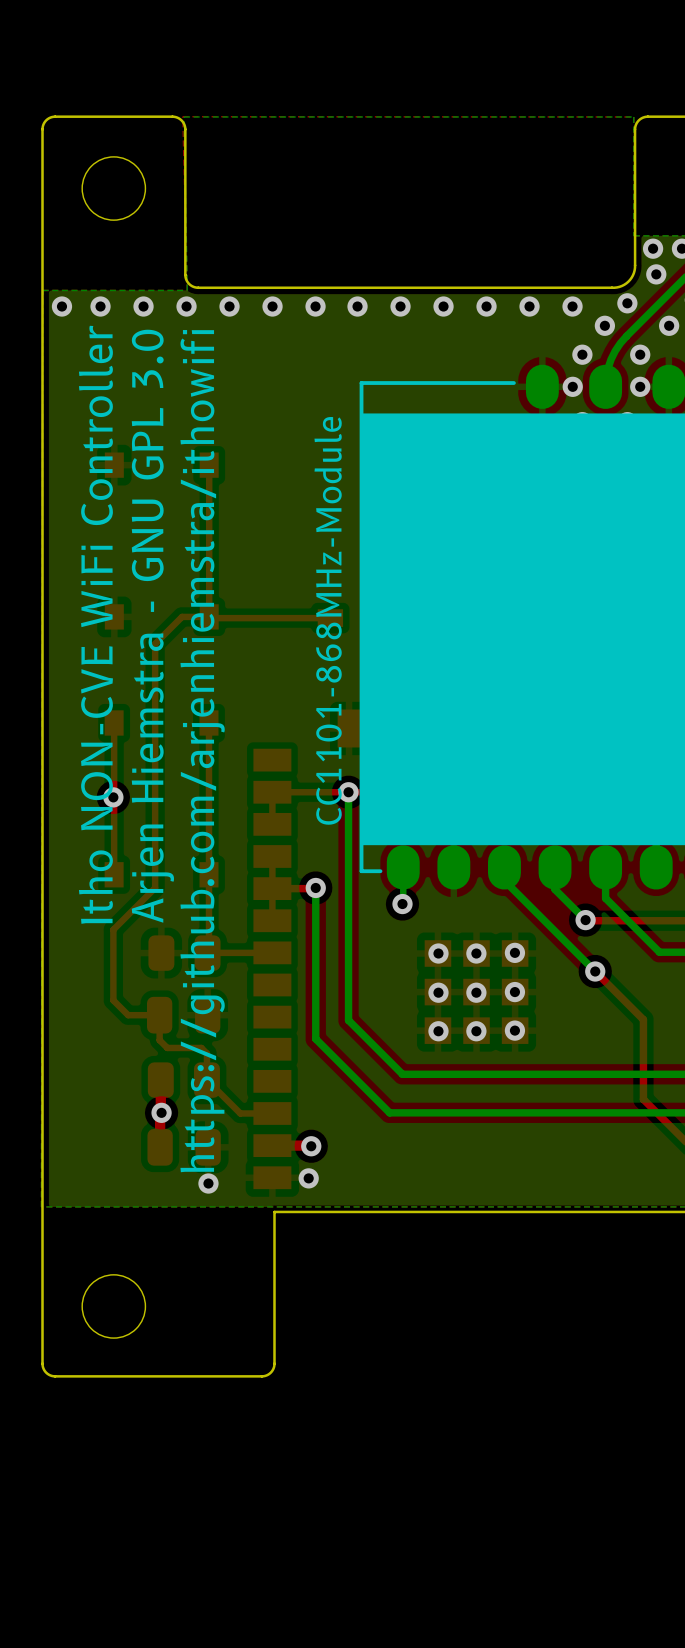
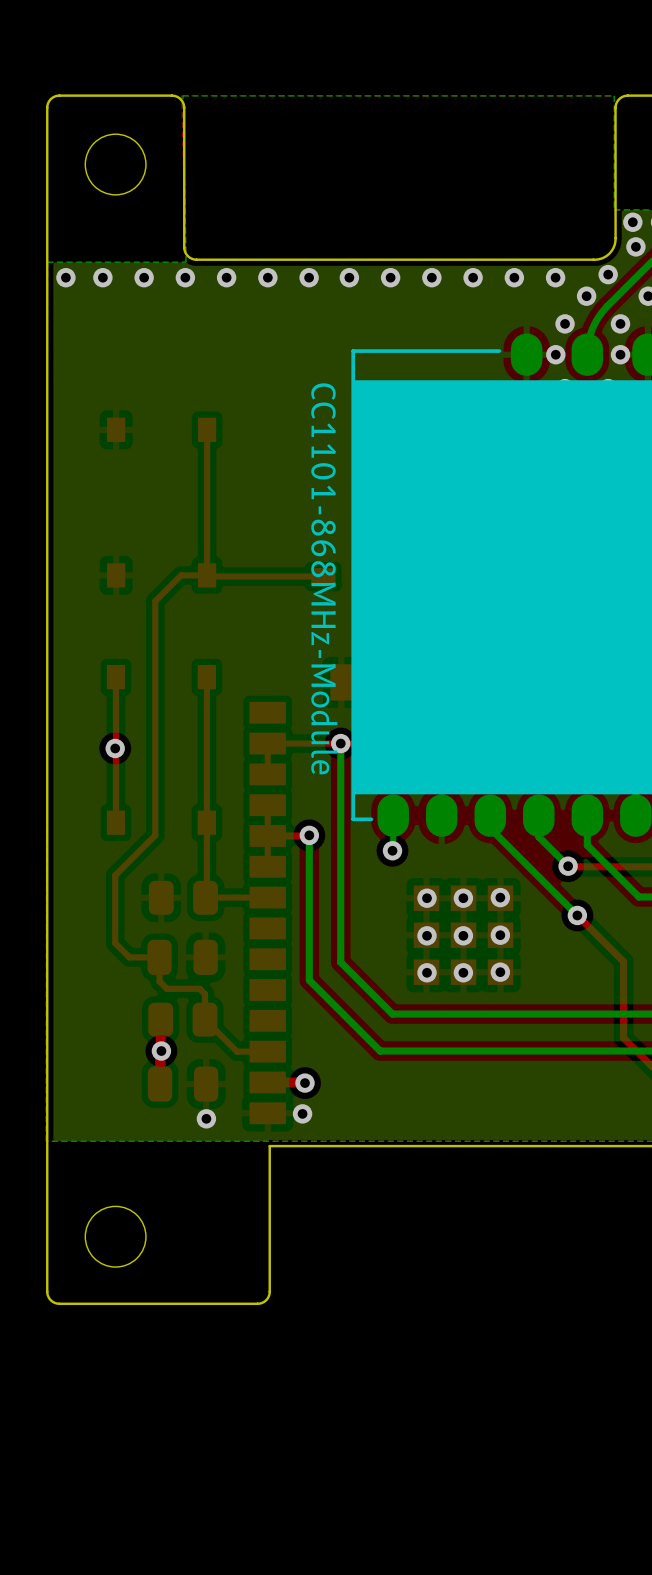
part value rotation: 0° (328, 620) -> 180° (324, 578)
text: Itho NON-CVE WiFi Controller (95, 624) -> none
text: Arjen Hiemstra - GNU GPL 3.0 (152, 626) -> none
text: https://github.com/arjenhiemstra/ithowifi (202, 751) -> none

